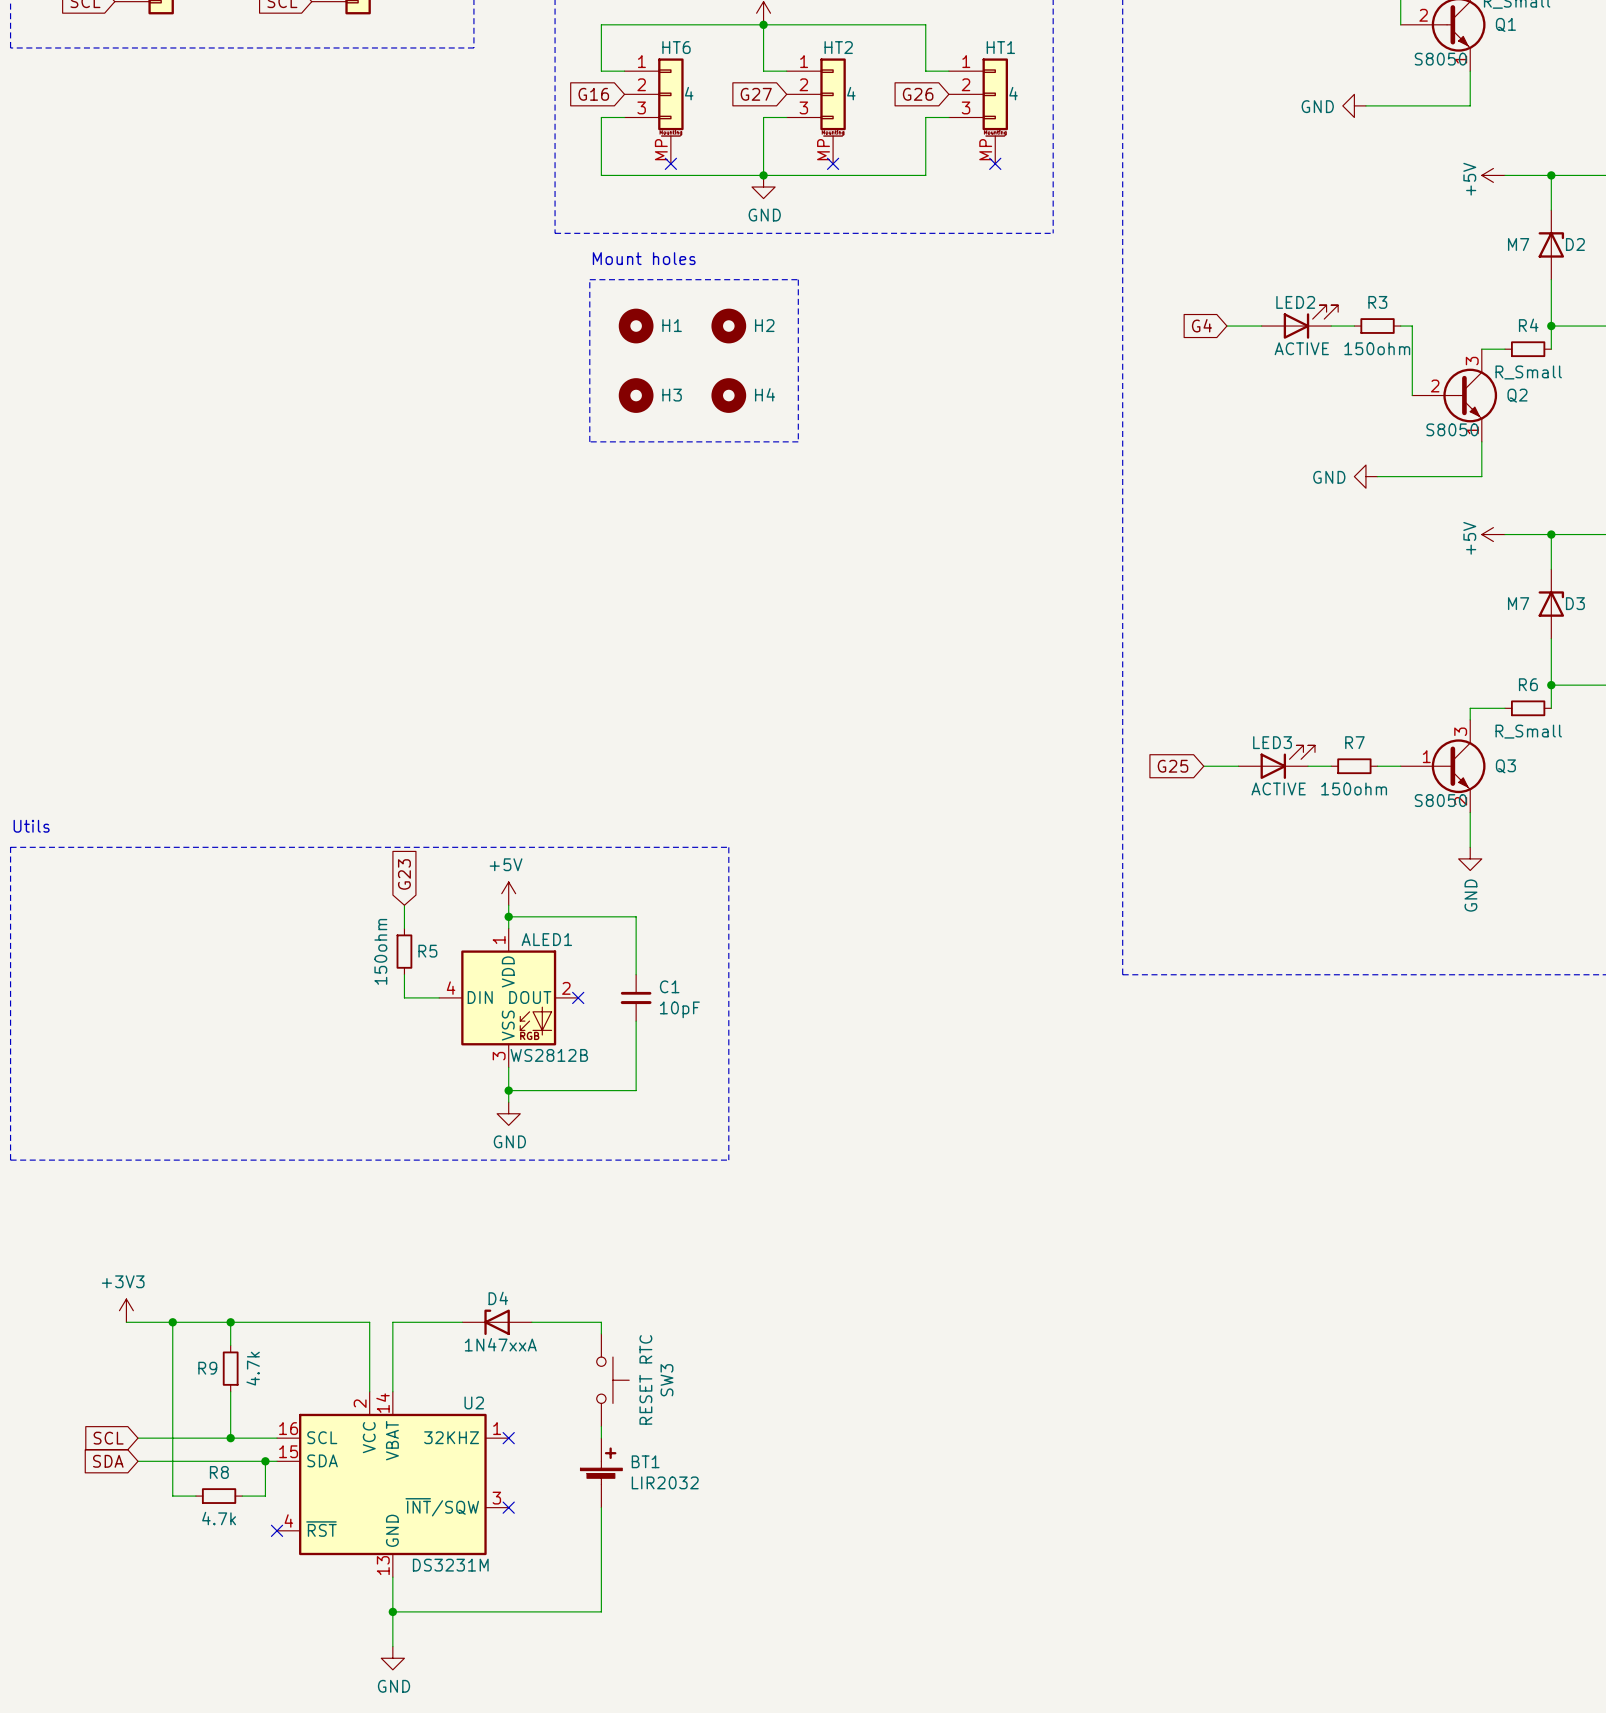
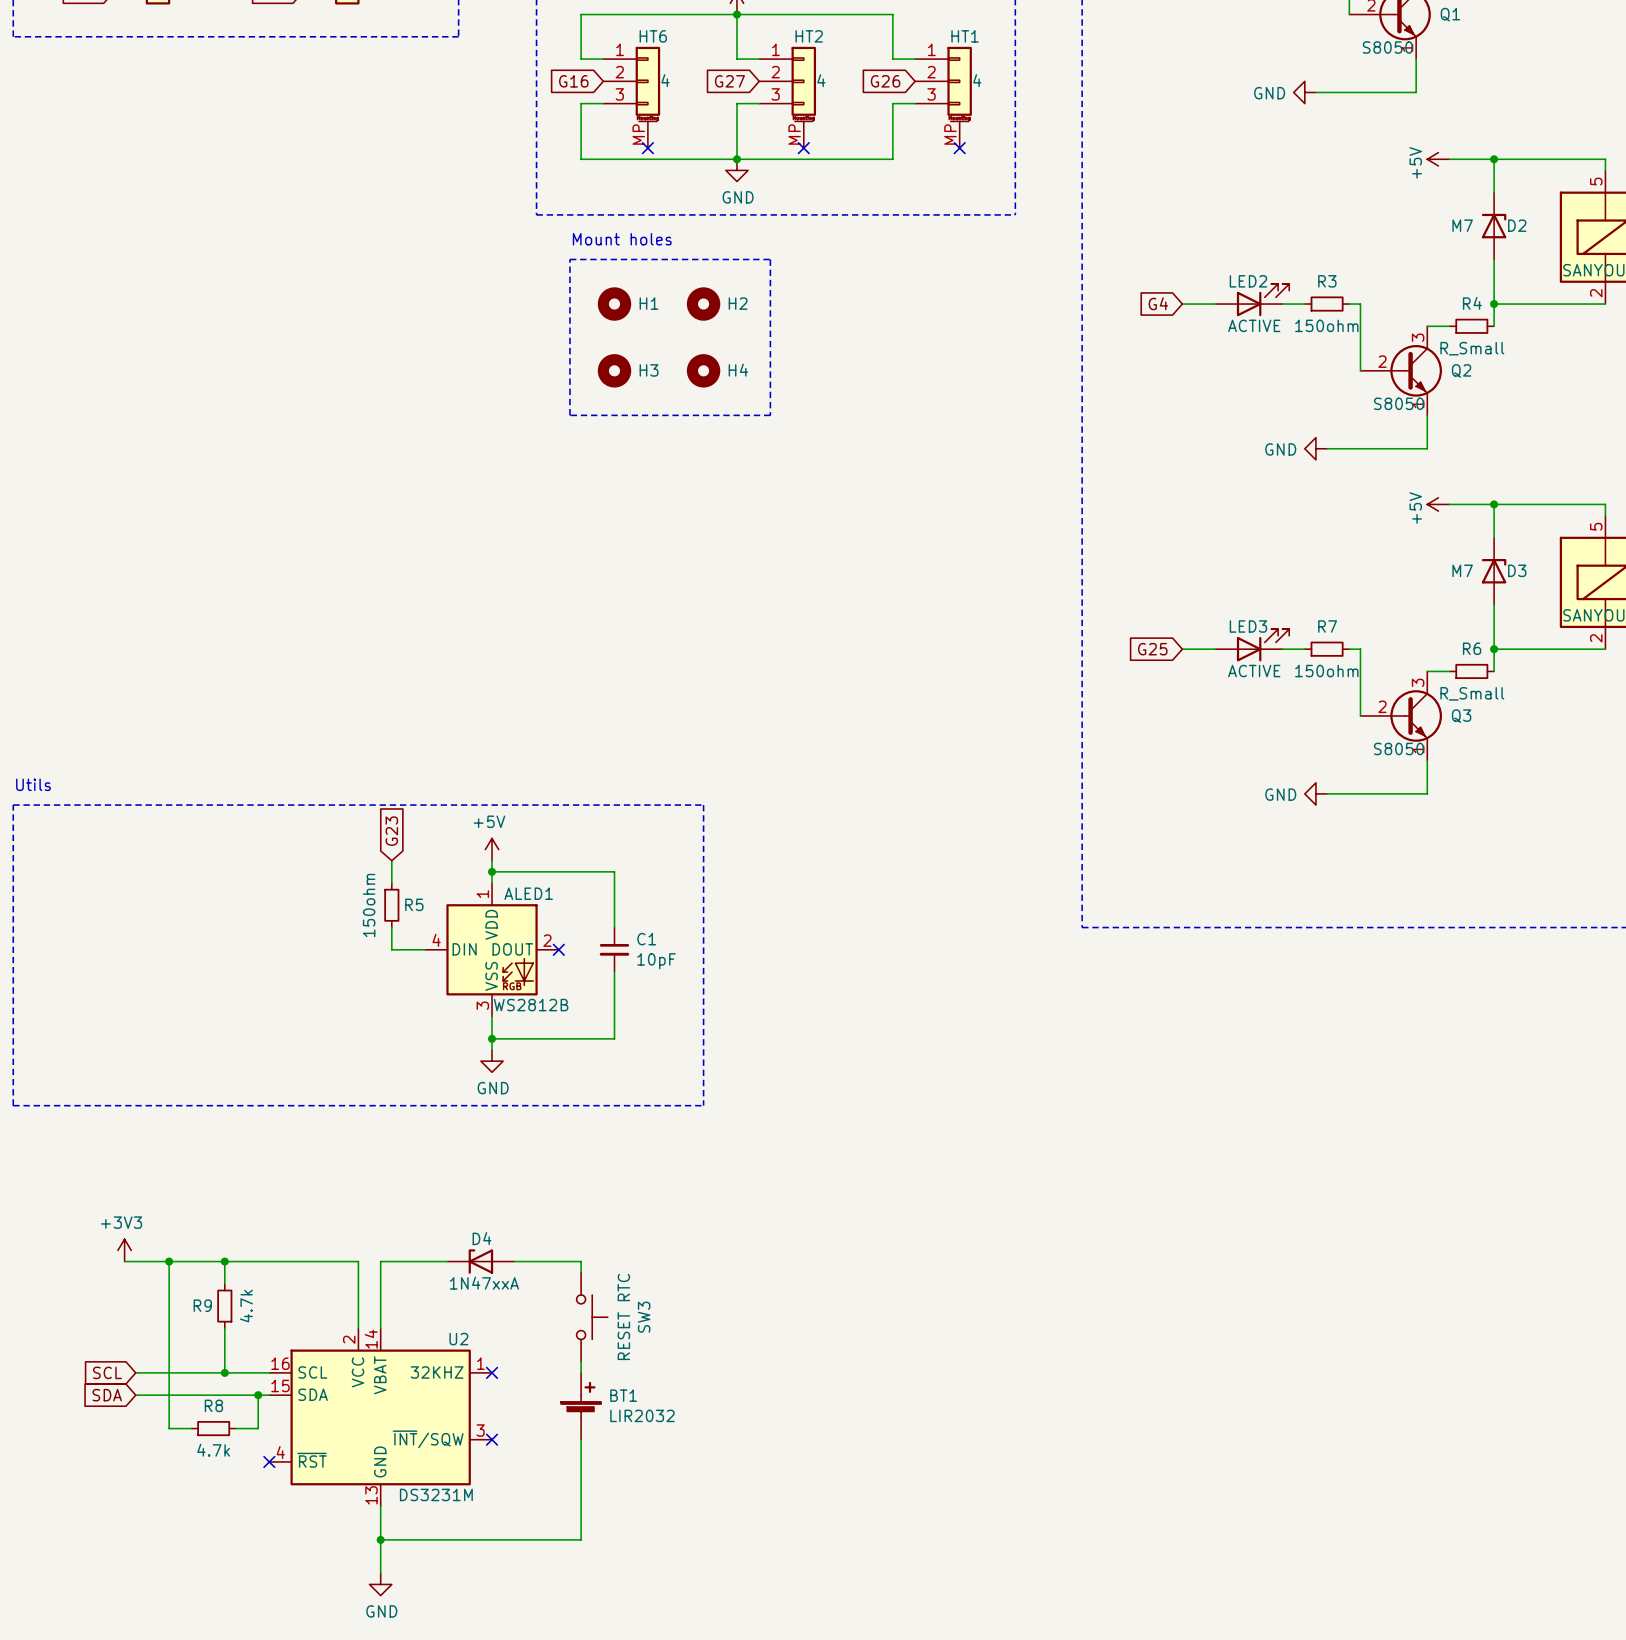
wire: none -> (1349, 649) (1360, 649) (1360, 715)
wire: (1481, 708) (1470, 708) (1470, 719) -> none
Q3 symbol: [1400, 719, 1486, 813] -> [1360, 671, 1442, 761]
LED3 position: (1276, 762) -> (1252, 645)
global label position: G25 (1173, 766) -> G25 (1152, 649)
wire: (1203, 766) (1238, 766) -> (1182, 649) (1215, 649)
wire: (1308, 766) (1331, 766) -> (1282, 649) (1304, 649)
R7 position: (1354, 766) -> (1327, 649)
wire: (1377, 766) (1400, 766) -> none
wire: none -> (1427, 760) (1427, 793) (1327, 793)
wire: (1470, 812) (1470, 847) -> none
power symbol rotation: 0° (1470, 858) -> 90° clockwise (1315, 793)
power symbol position: GND (1470, 858) -> GND (1315, 793)

